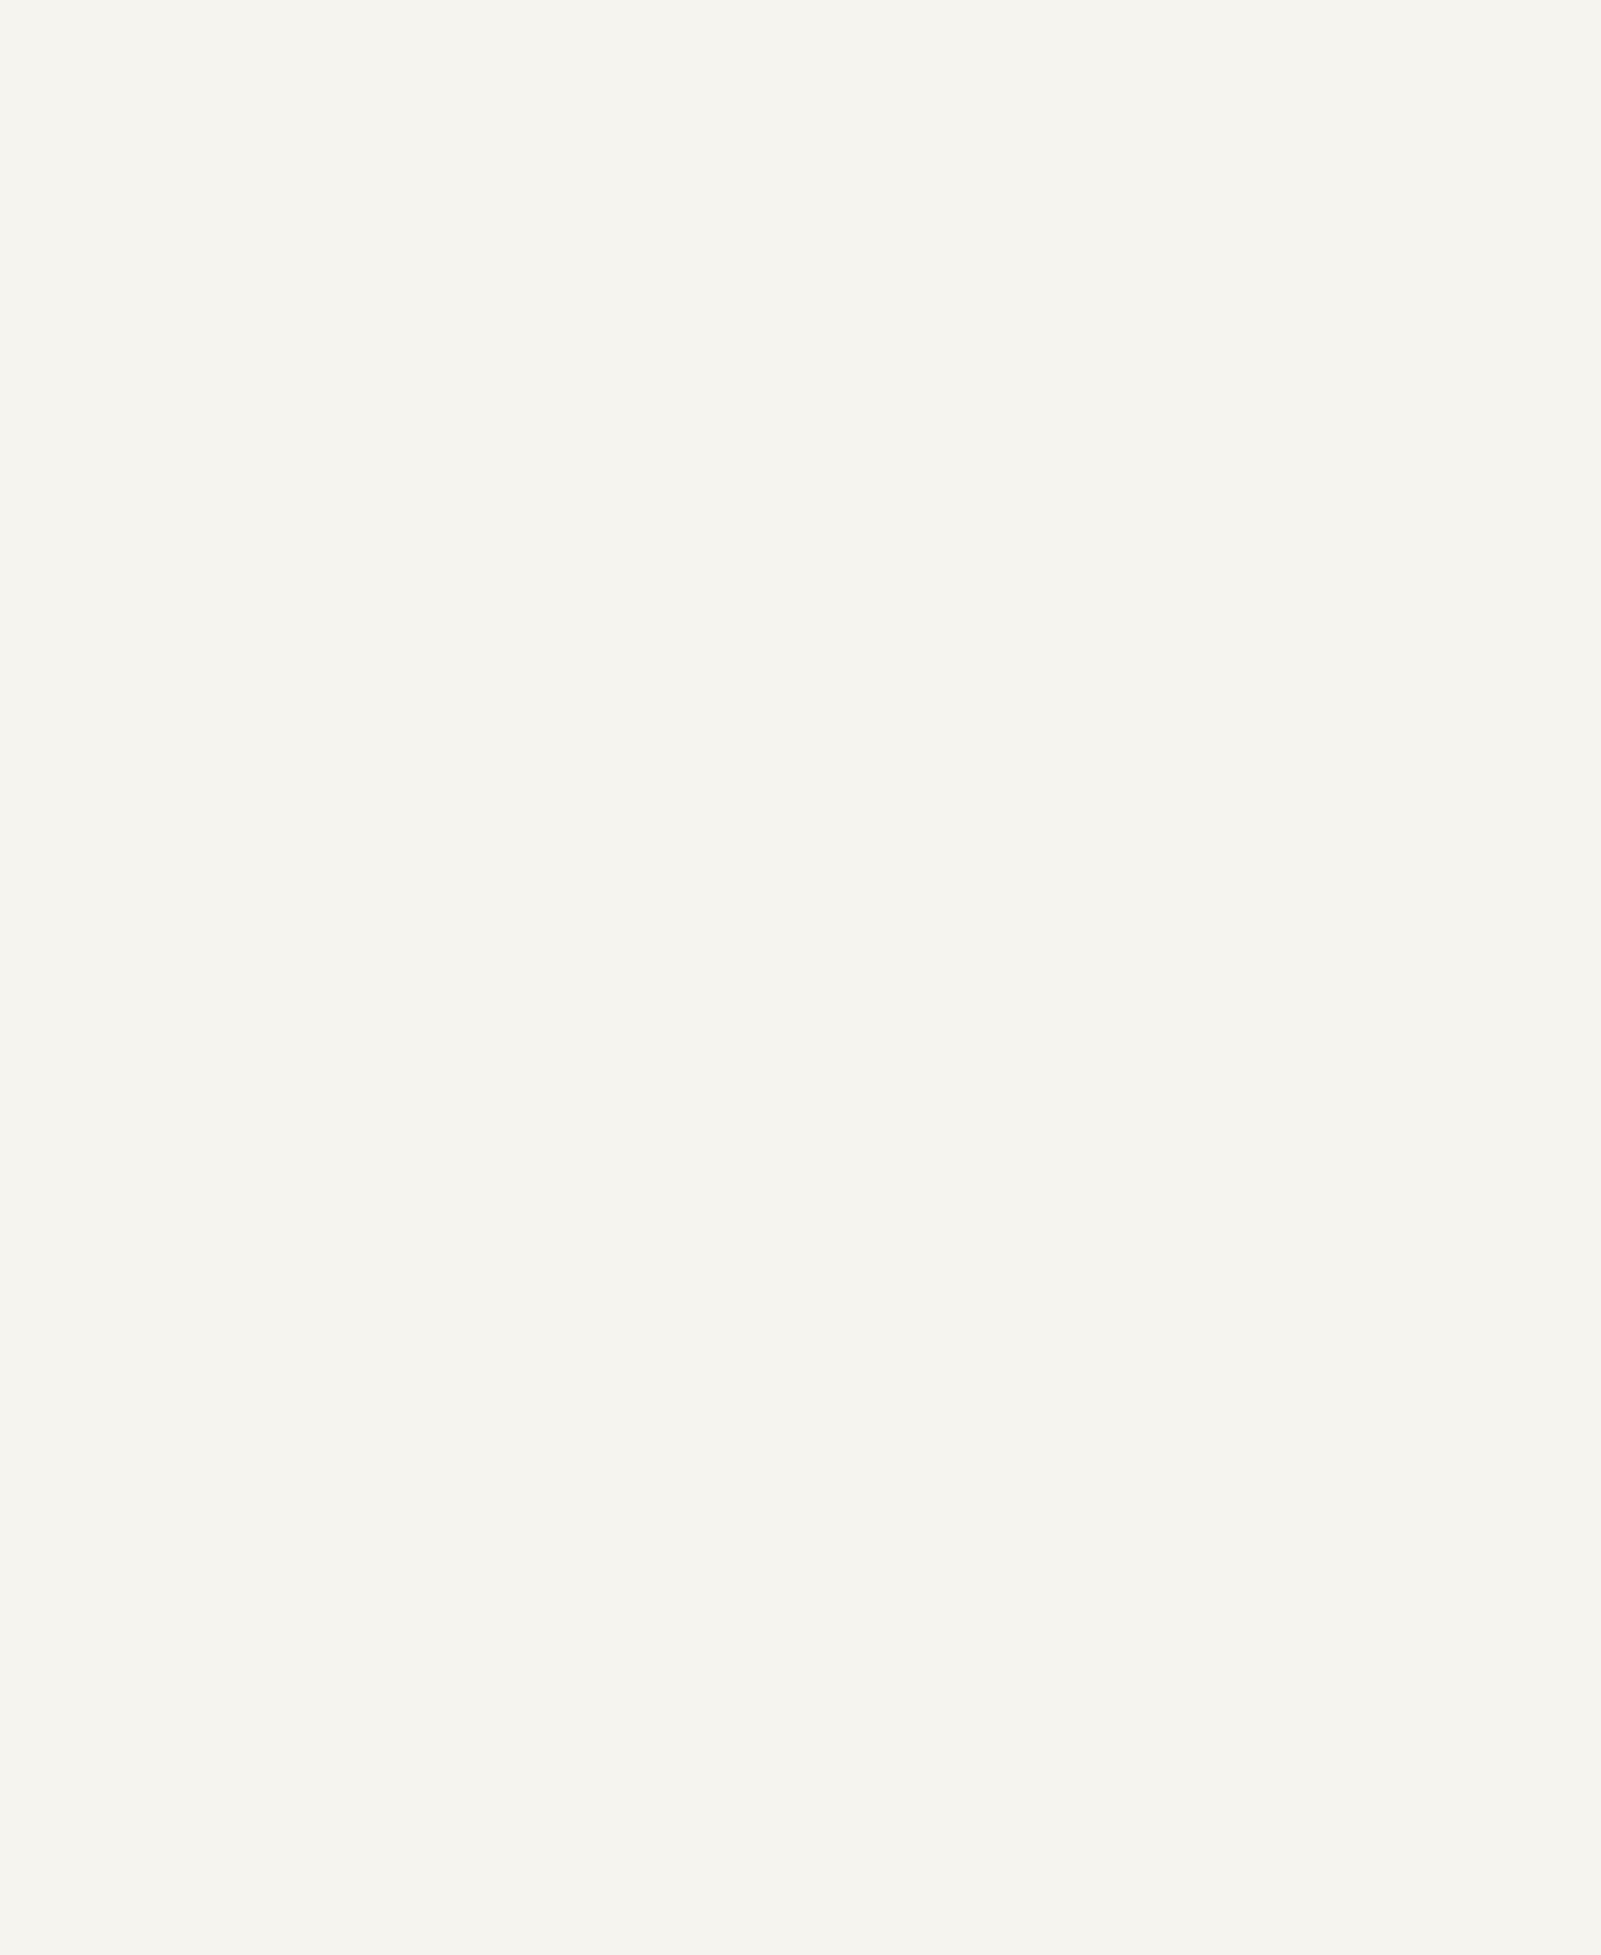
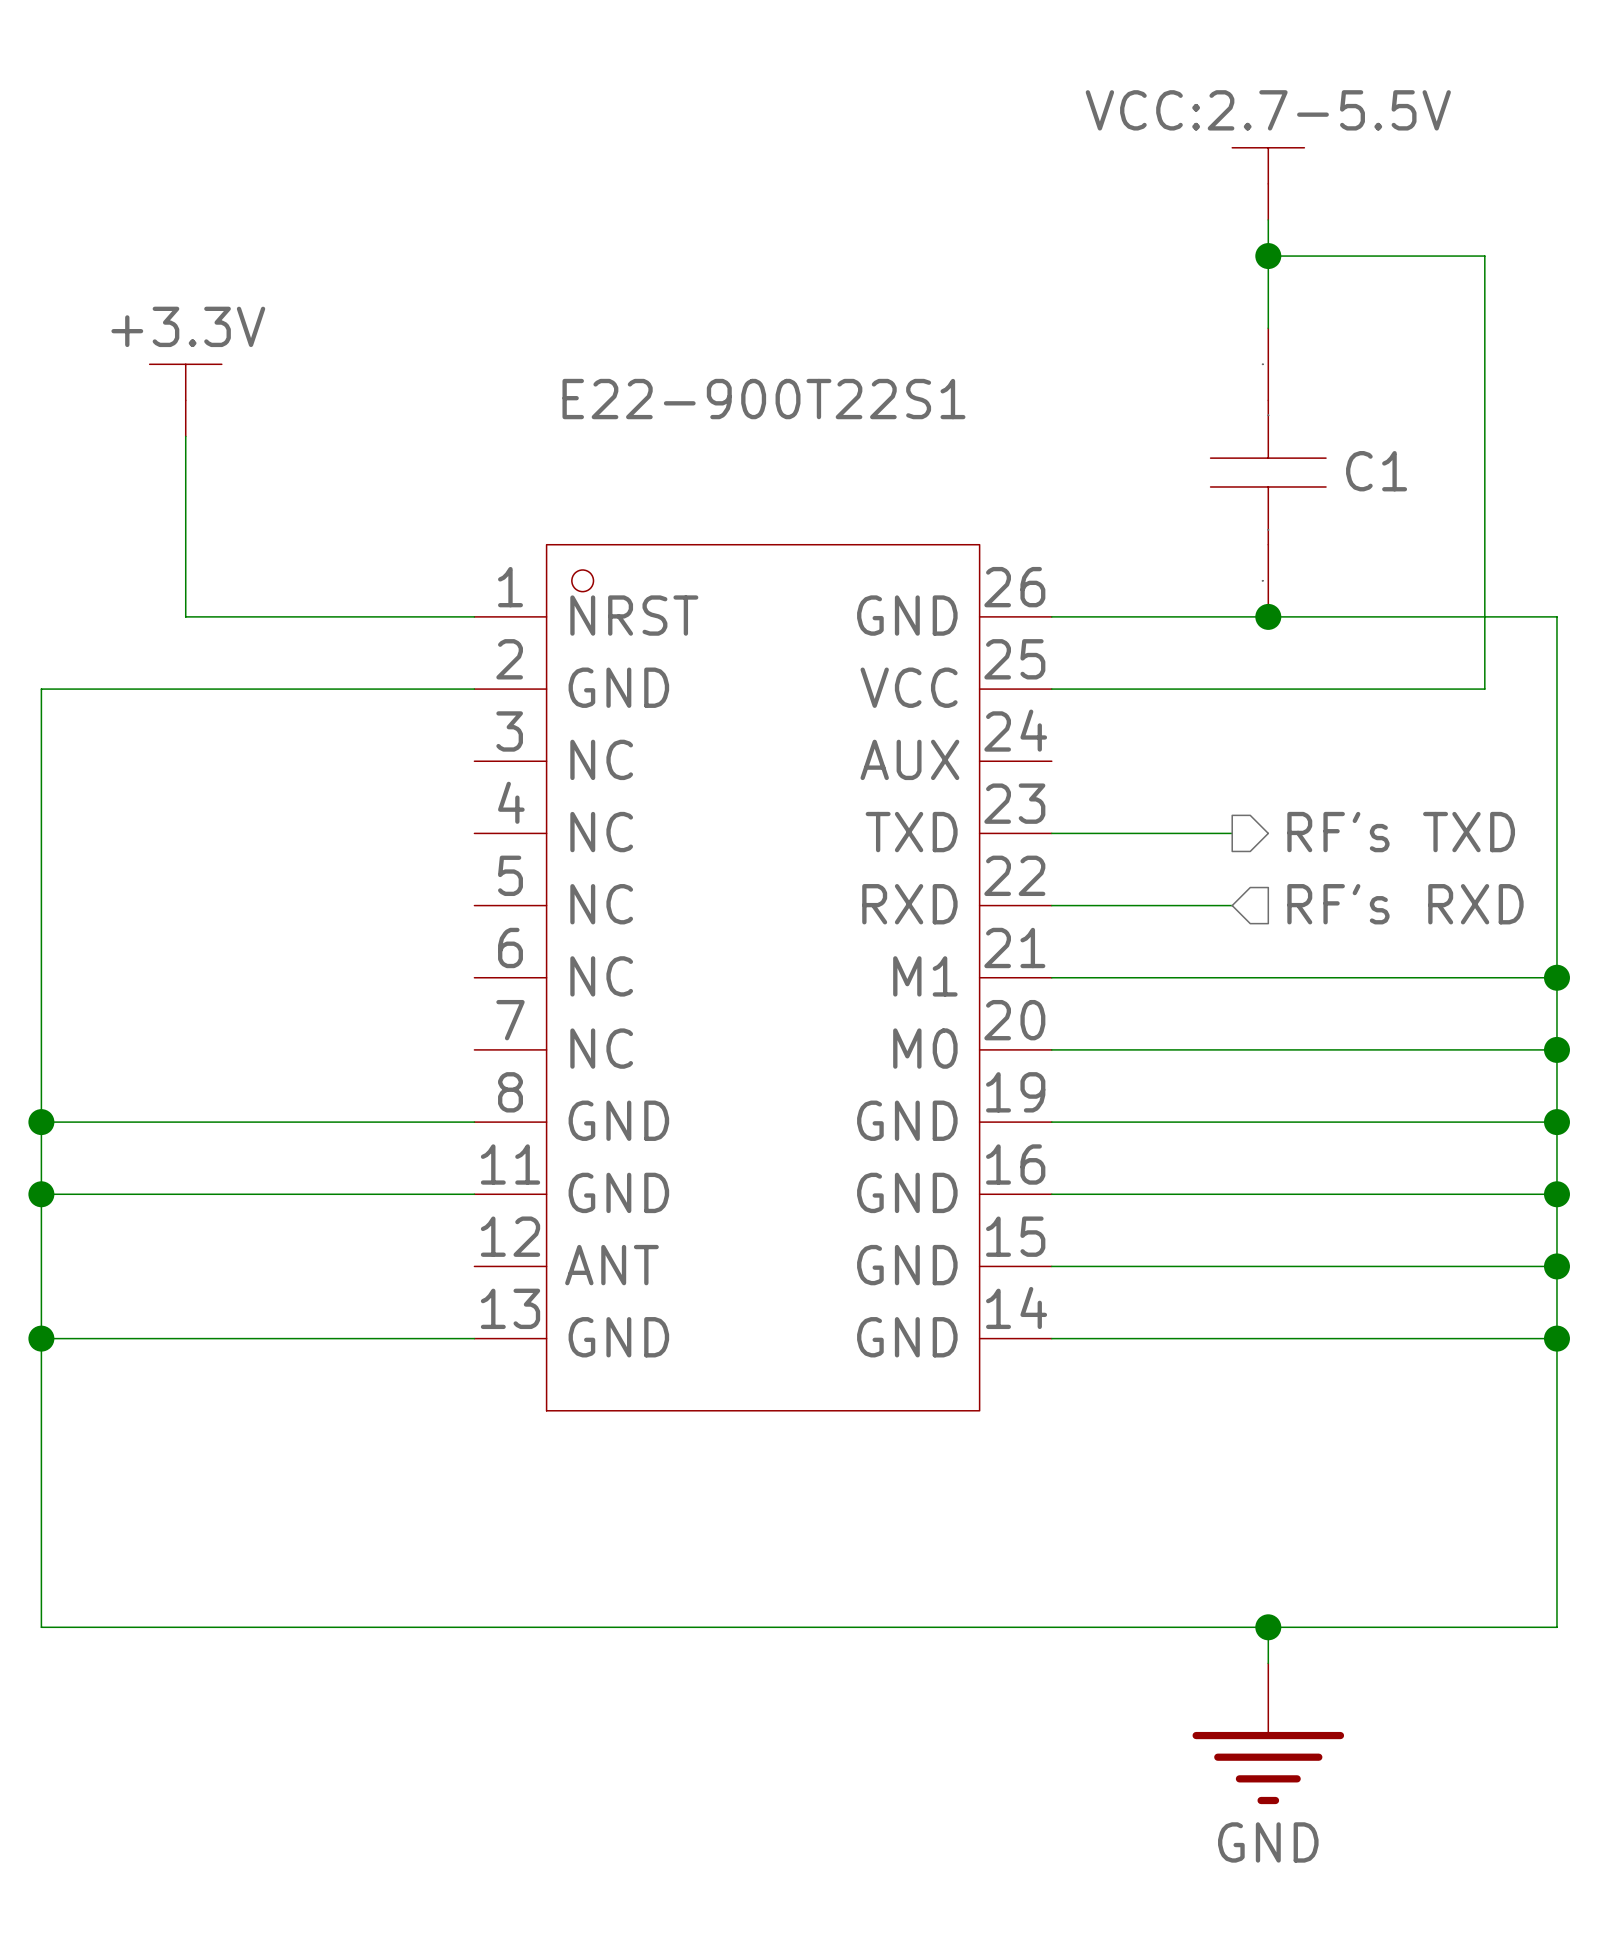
power symbol: none -> VCC:2.7-5.5V (1268, 183)
wire: none -> (1268, 219) (1268, 328)
wire: none -> (1268, 256) (1484, 256) (1484, 689) (1051, 689)
junction: none -> (1268, 256)
power symbol: none -> +3.3V (185, 400)
wire: none -> (185, 436) (185, 616) (474, 616)
C1: none -> (1268, 472)
wire: none -> (1051, 616) (1556, 616) (1556, 1627) (41, 1627) (41, 689) (474, 689)
junction: none -> (1268, 616)
hierarchical label: none -> RF's TXD (1401, 832)
wire: none -> (1051, 833) (1232, 833)
hierarchical label: none -> RF's RXD (1405, 904)
wire: none -> (1051, 905) (1232, 905)
E22-900T22S1: none -> (763, 977)
wire: none -> (1051, 977) (1556, 977)
junction: none -> (1556, 977)
wire: none -> (1051, 1049) (1556, 1049)
junction: none -> (1556, 1049)
wire: none -> (41, 1122) (474, 1122)
junction: none -> (41, 1122)
wire: none -> (1051, 1122) (1556, 1122)
junction: none -> (1556, 1122)
wire: none -> (41, 1194) (474, 1194)
junction: none -> (41, 1194)
wire: none -> (1051, 1194) (1556, 1194)
junction: none -> (1556, 1194)
wire: none -> (1051, 1266) (1556, 1266)
junction: none -> (1556, 1266)
wire: none -> (41, 1338) (474, 1338)
junction: none -> (41, 1338)
wire: none -> (1051, 1338) (1556, 1338)
junction: none -> (1556, 1338)
wire: none -> (1268, 1627) (1268, 1663)
junction: none -> (1268, 1627)
power symbol: none -> GND (1268, 1733)

